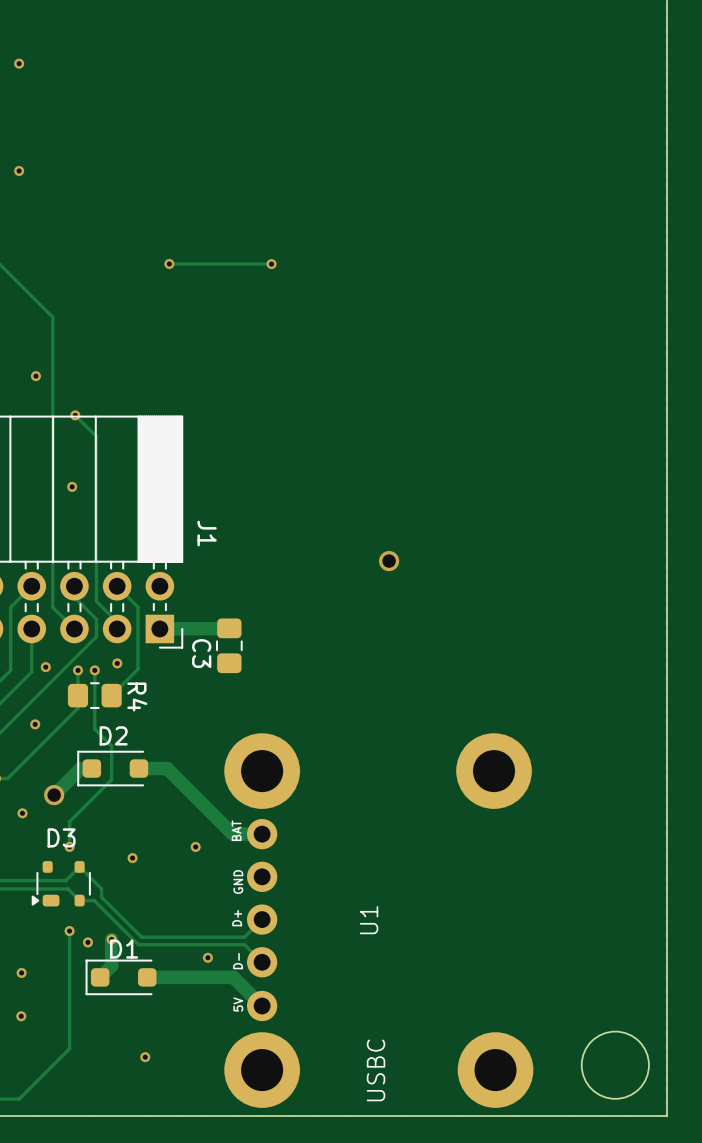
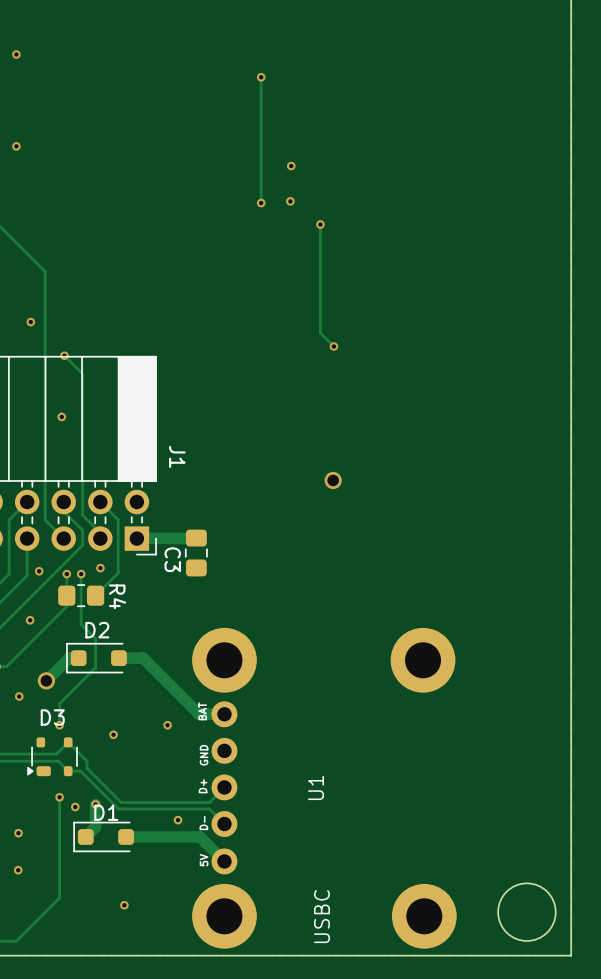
track: none -> (261, 77) (261, 203)
via: none -> (261, 77)
via: none -> (291, 166)
via: none -> (290, 201)
via: none -> (261, 203)
track: none -> (320, 224) (320, 333) (333, 346)
via: none -> (320, 224)
via: (169, 263) -> none
track: (271, 263) (169, 263) -> none
via: (271, 264) -> none
via: none -> (333, 346)

